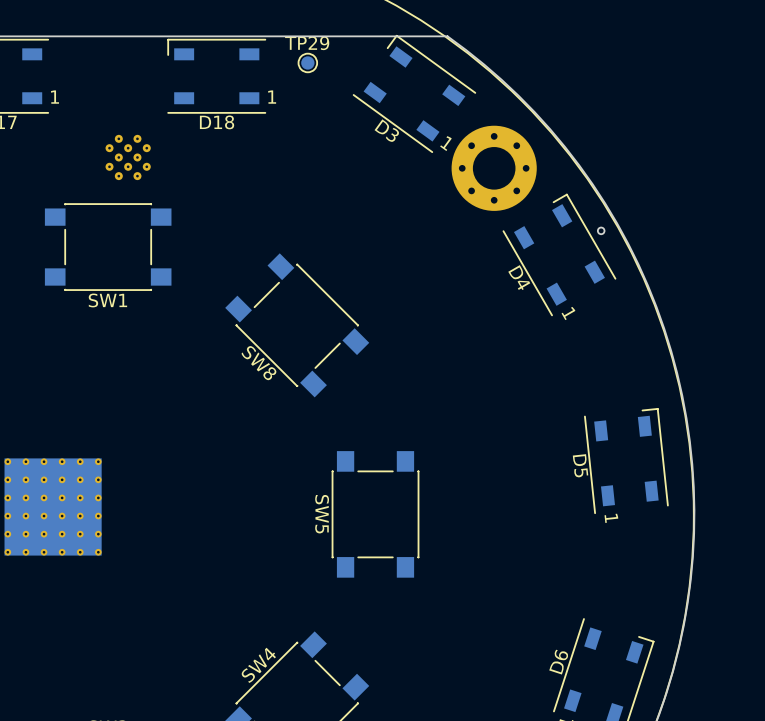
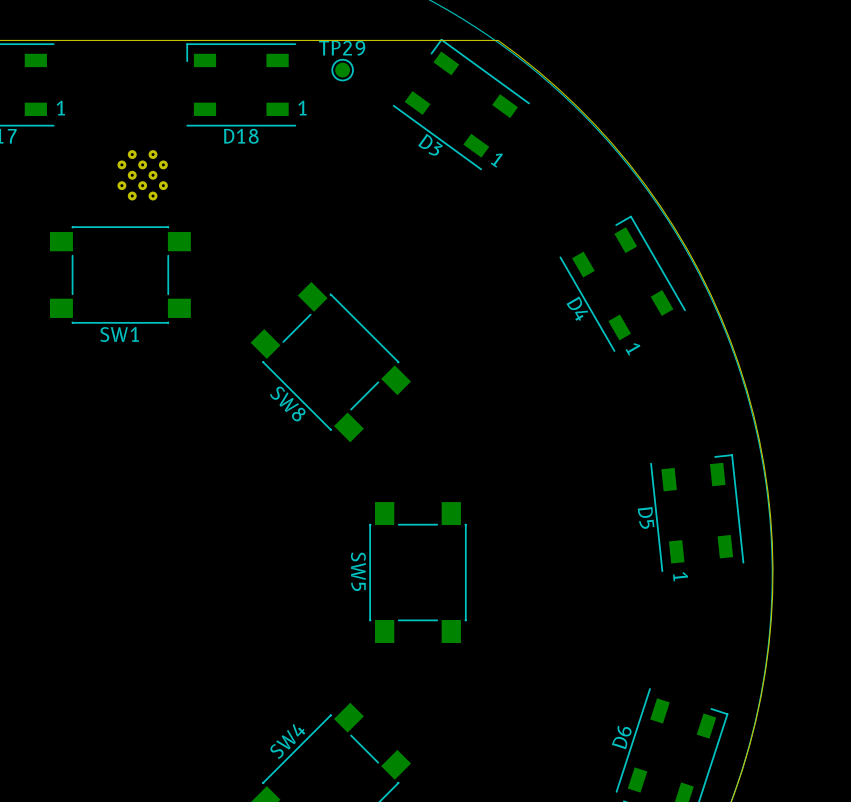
part: (494, 168) -> none
part: (601, 230) -> none
part: (53, 506) -> none

